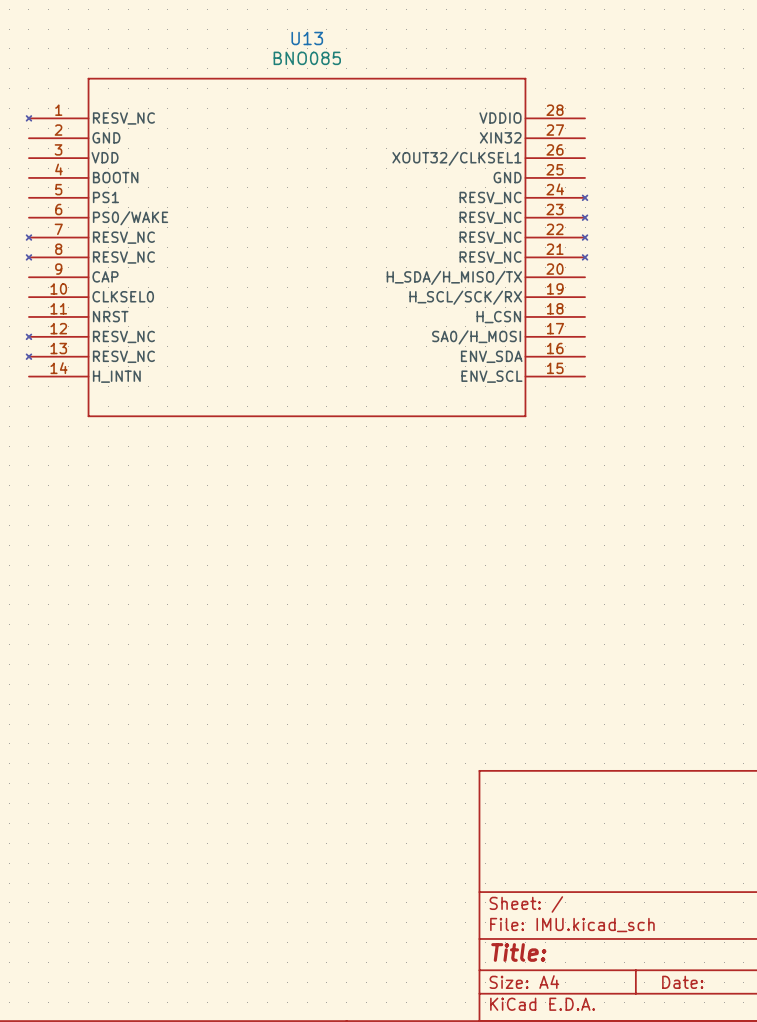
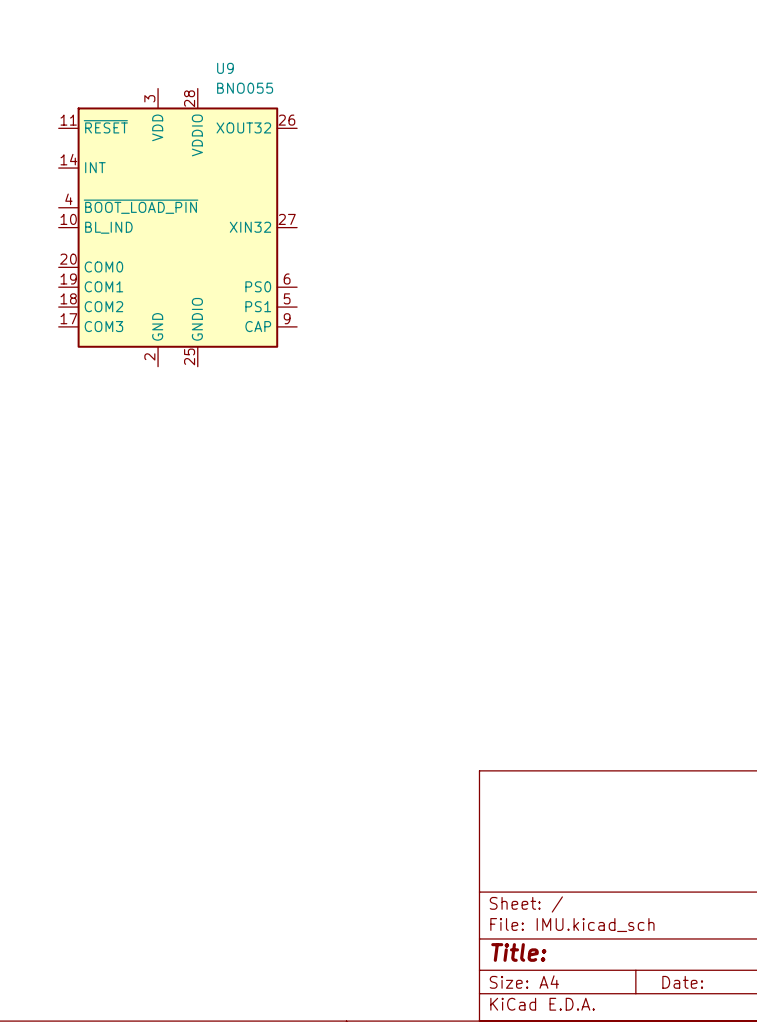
U9: none -> BNO055 (177, 227)
U13: BNO085 (307, 247) -> none

